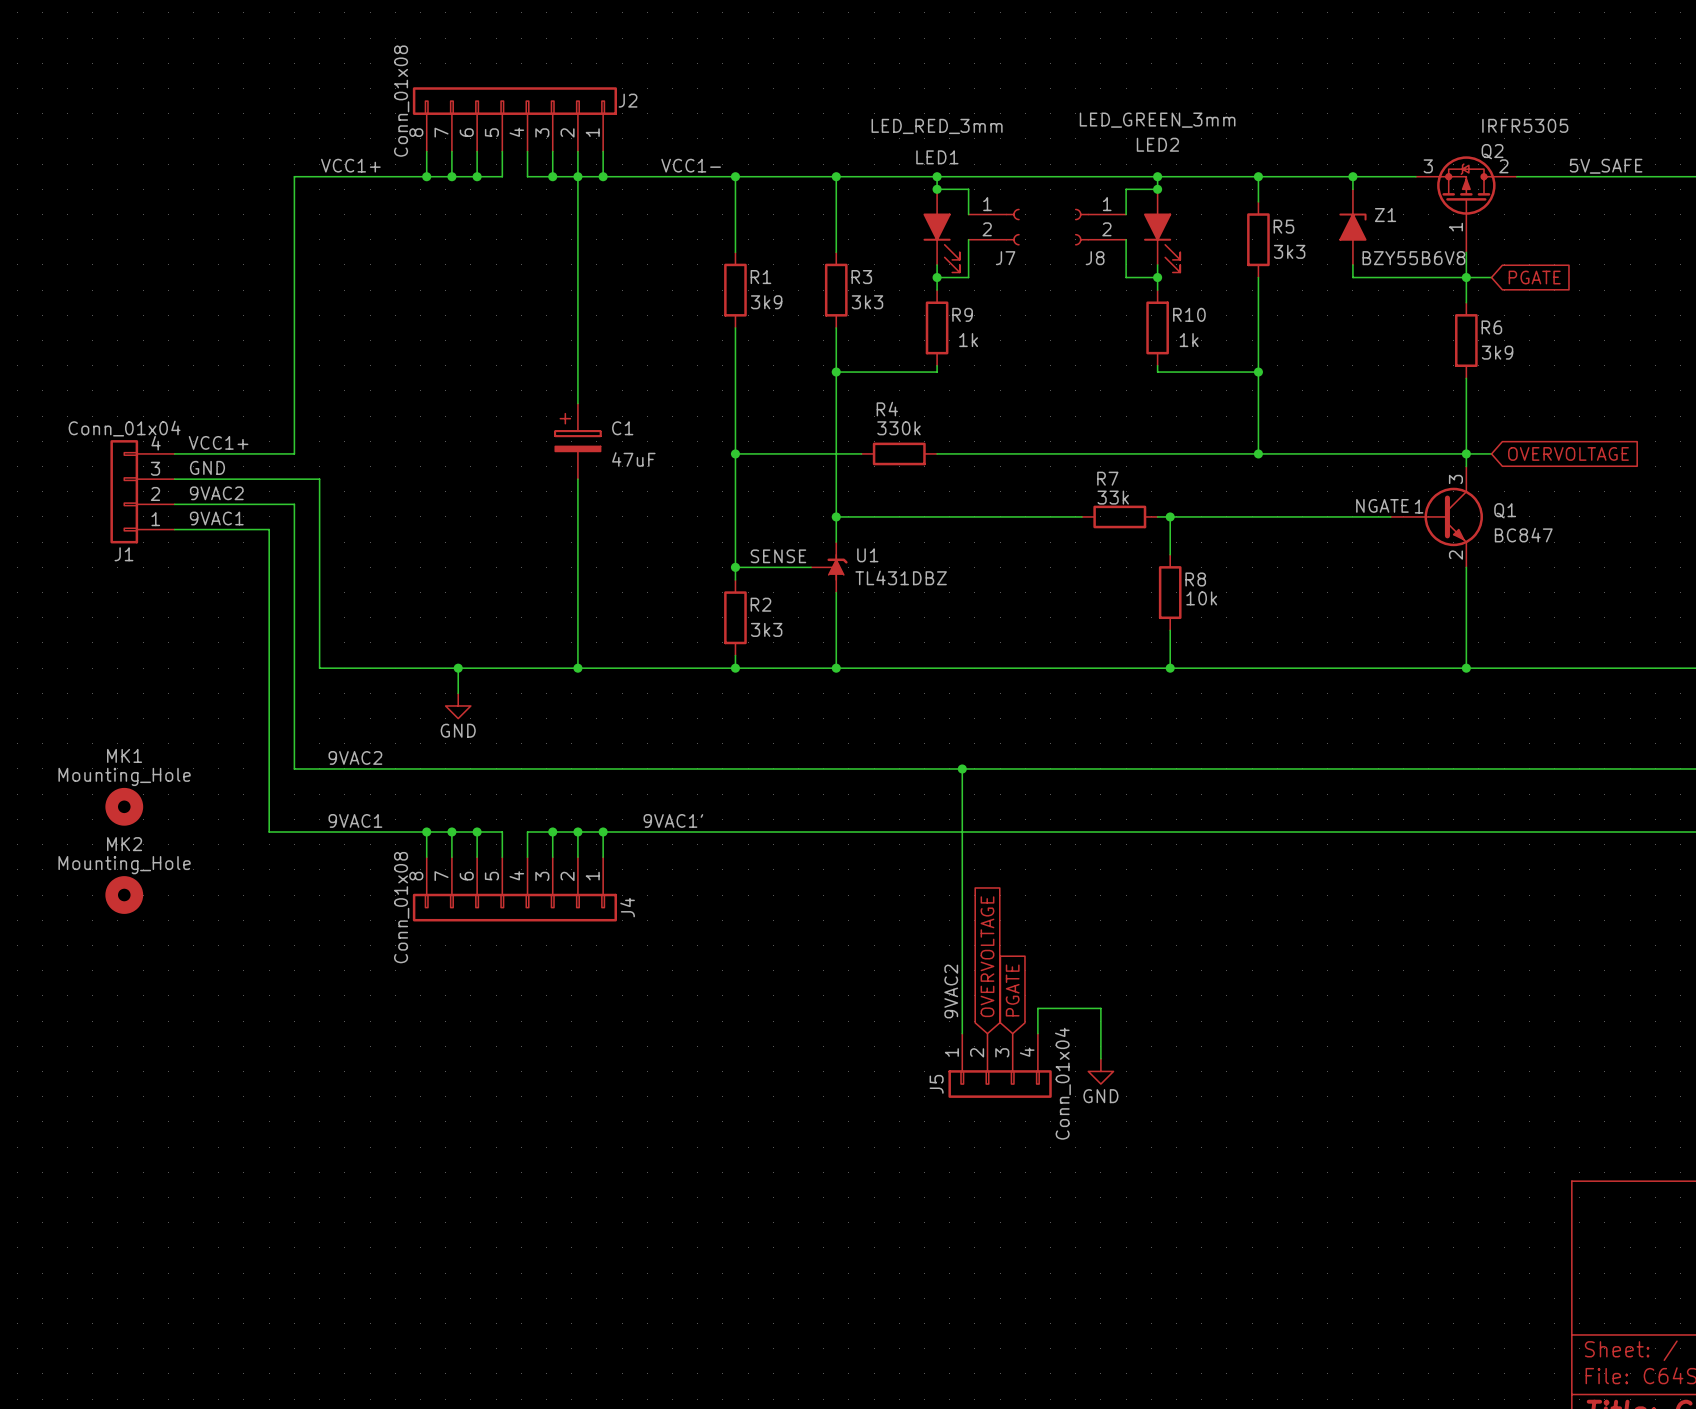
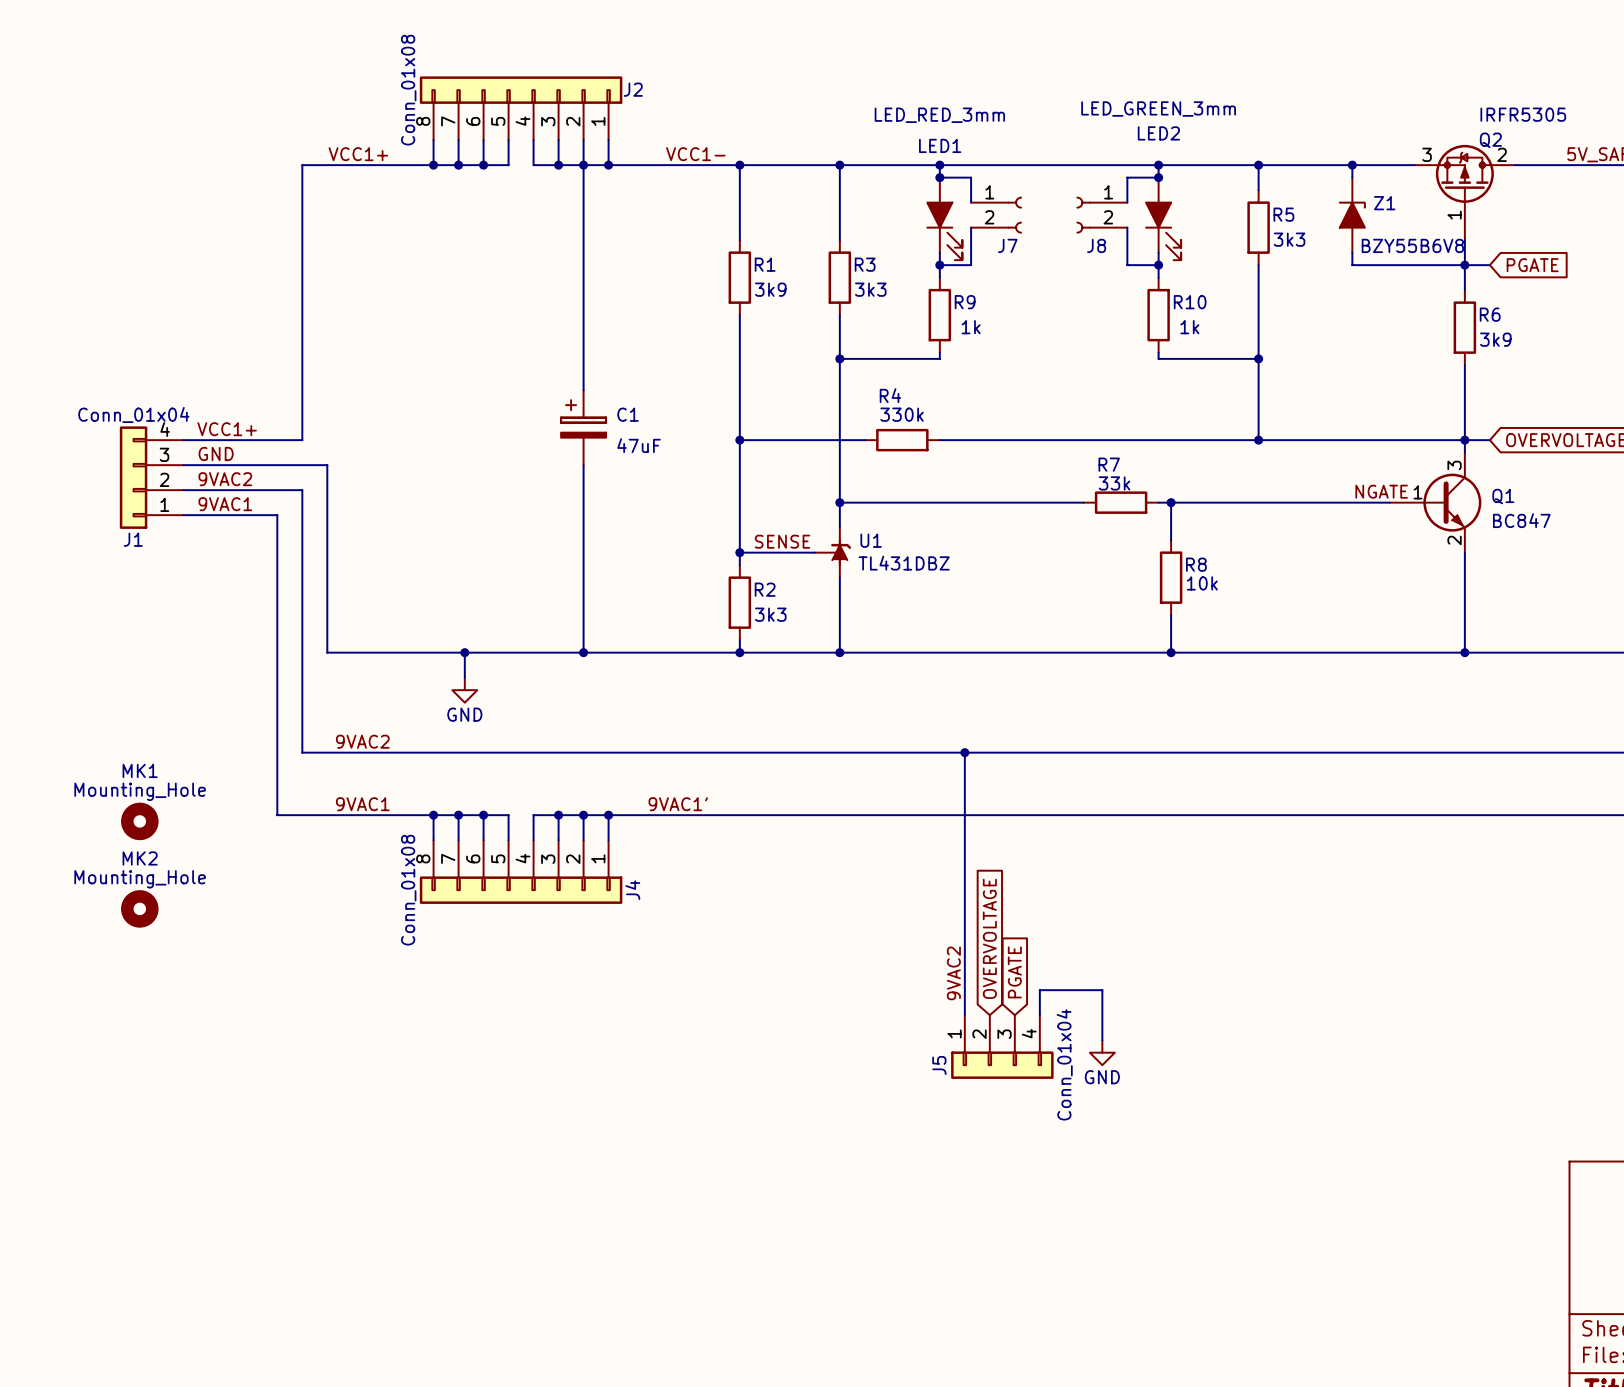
MK1 position: (124, 806) -> (139, 821)
MK2 position: (124, 895) -> (139, 908)

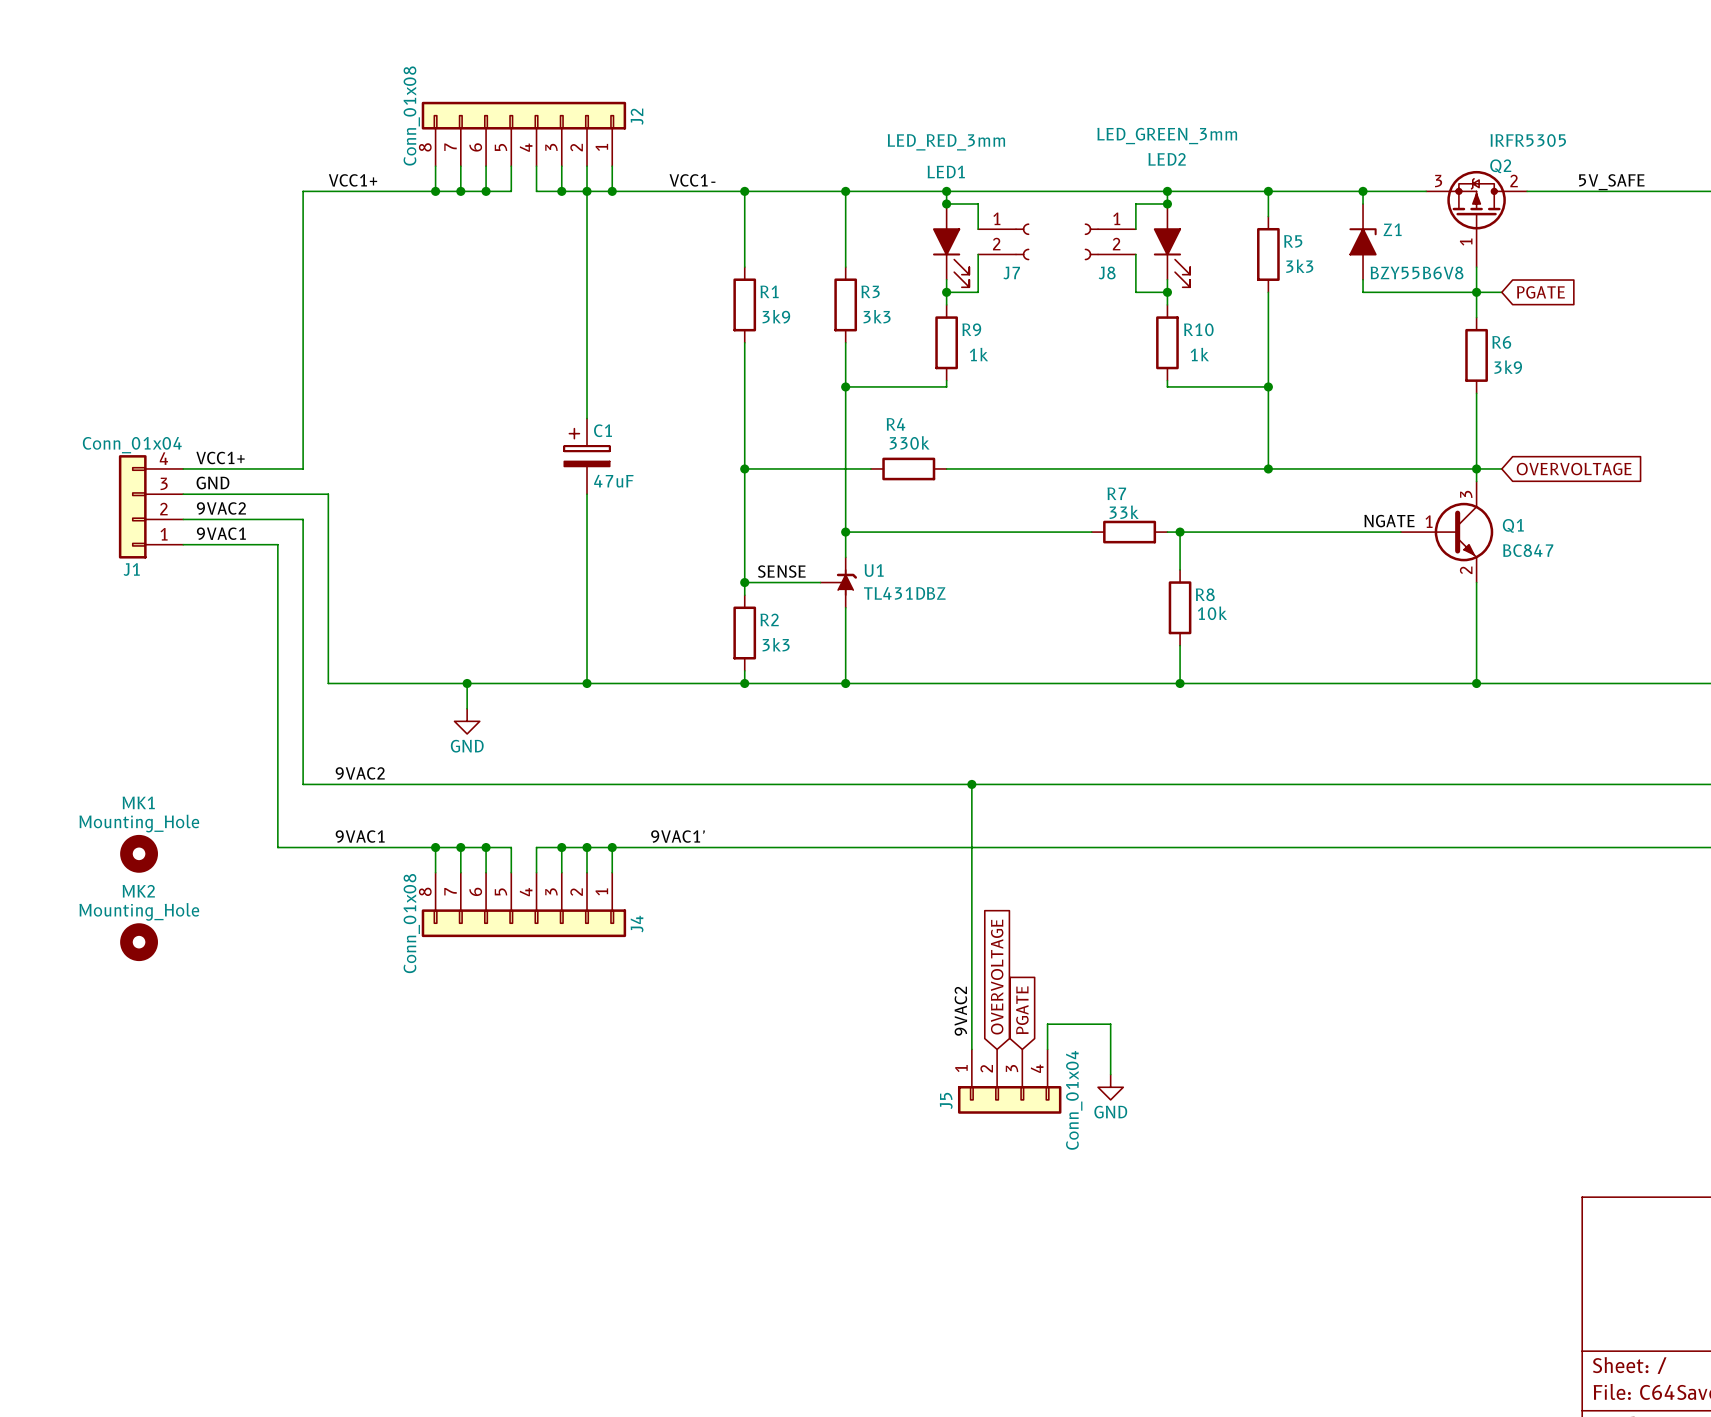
J2 name rotation: 0° (633, 89) -> 90° counterclockwise (637, 116)
C1 name position: C1 (628, 414) -> C1 (603, 430)
C1 value position: 47uF (639, 445) -> 47uF (613, 481)

